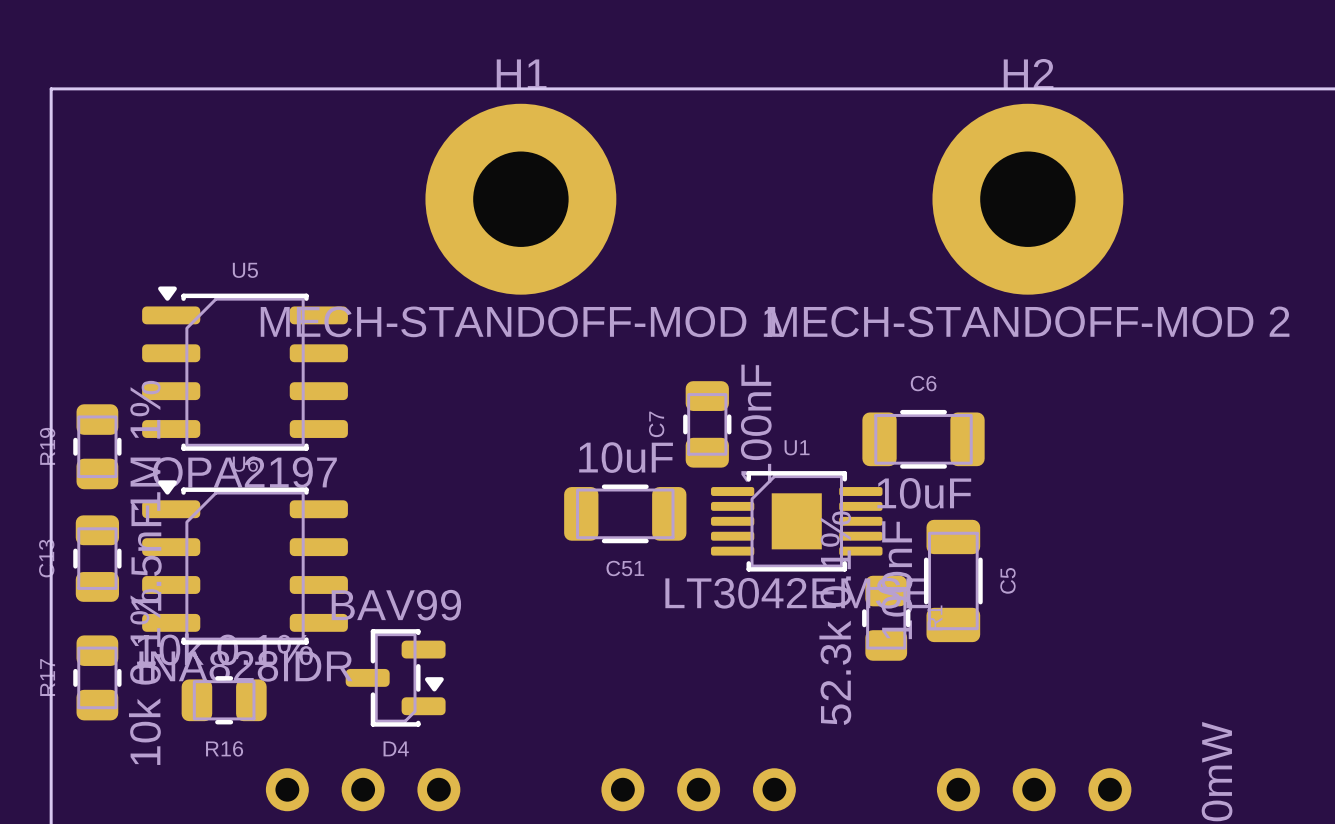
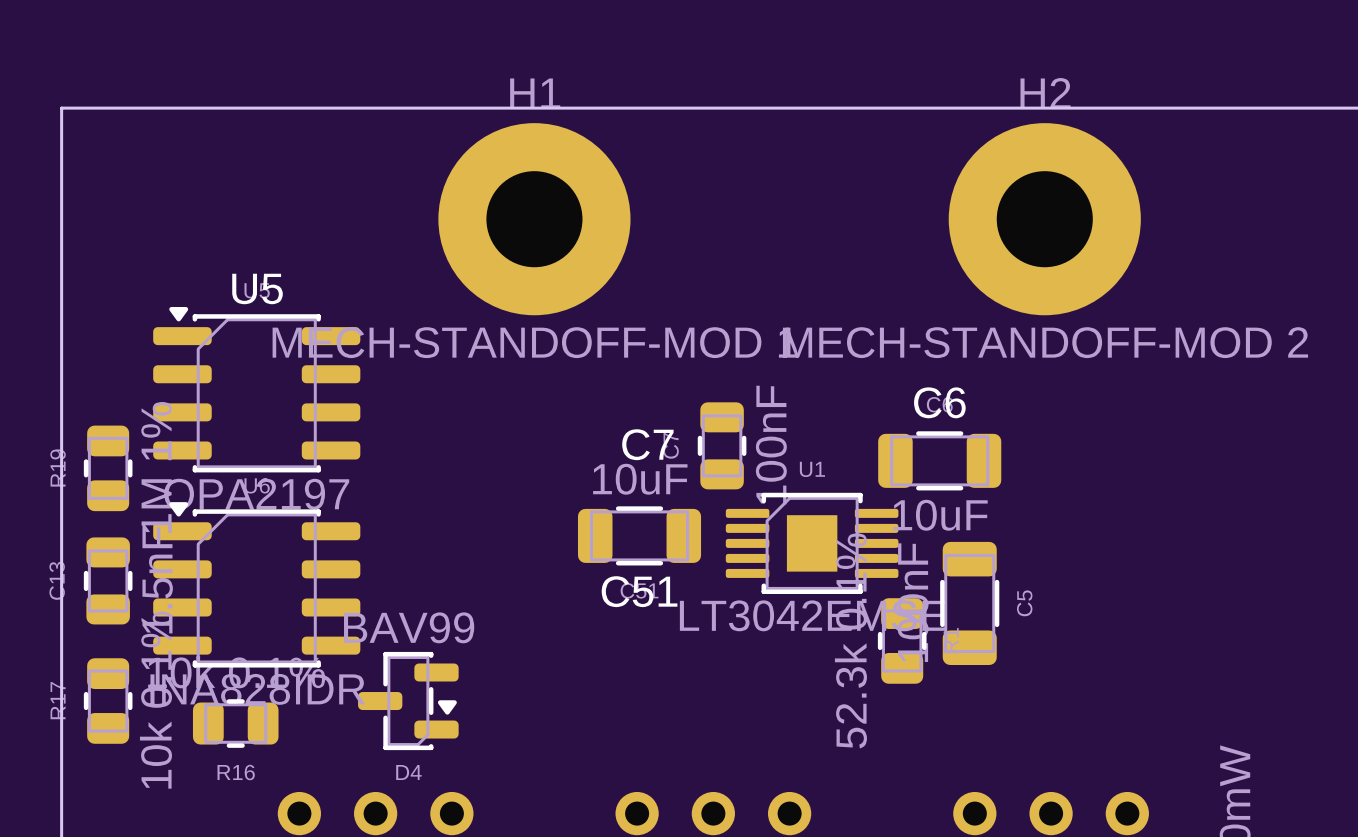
text: none -> U5 (257, 288)
text: none -> C6 (939, 402)
text: none -> C7 (647, 444)
text: none -> C51 (639, 591)

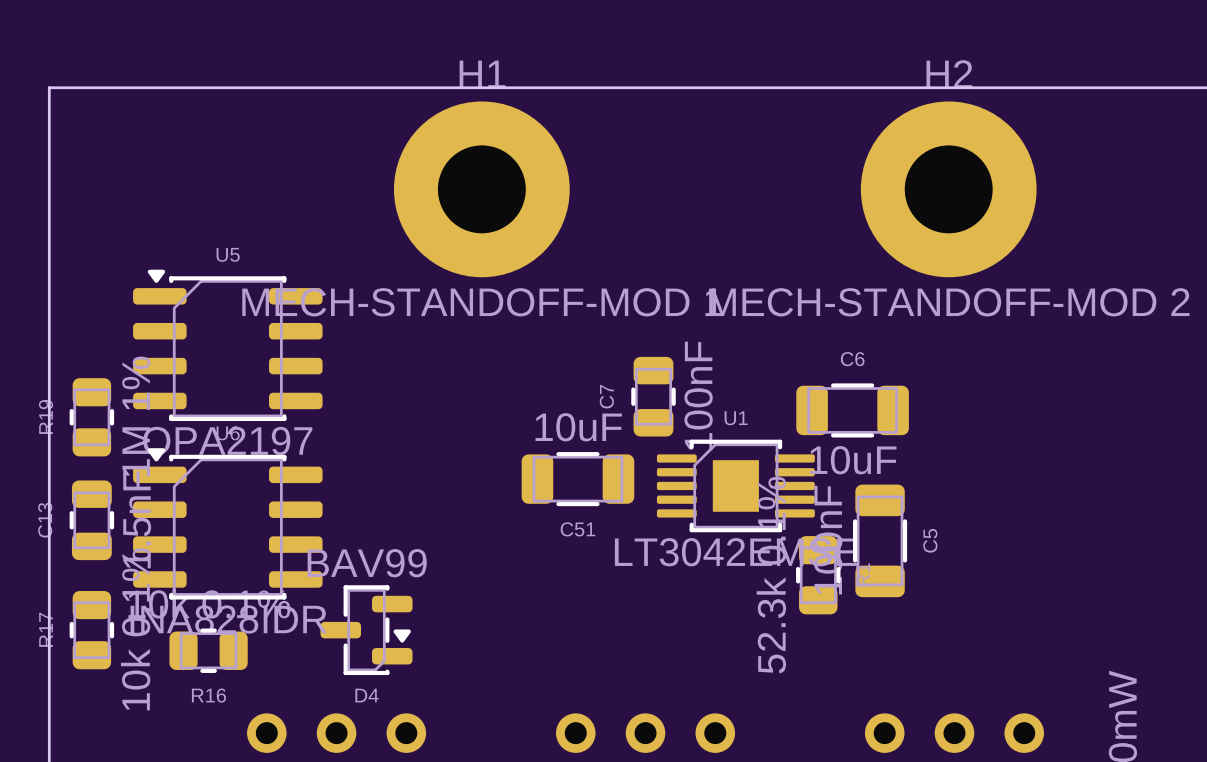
text: U5 (257, 288) -> none
text: C6 (939, 402) -> none
text: C7 (647, 444) -> none
text: C51 (639, 591) -> none

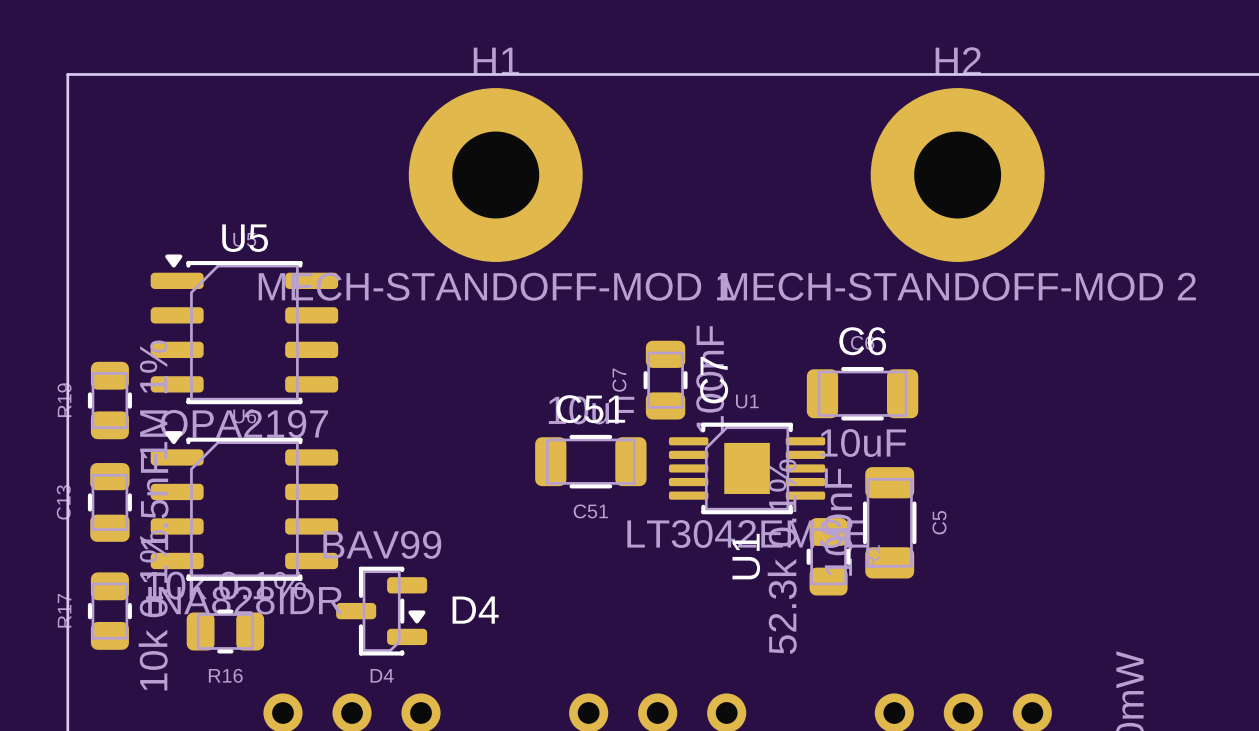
text: none -> U5 (245, 238)
text: none -> C6 (862, 341)
text: none -> C7 (714, 380)
text: none -> C51 (590, 409)
text: none -> U1 (746, 556)
text: none -> D4 (475, 610)

